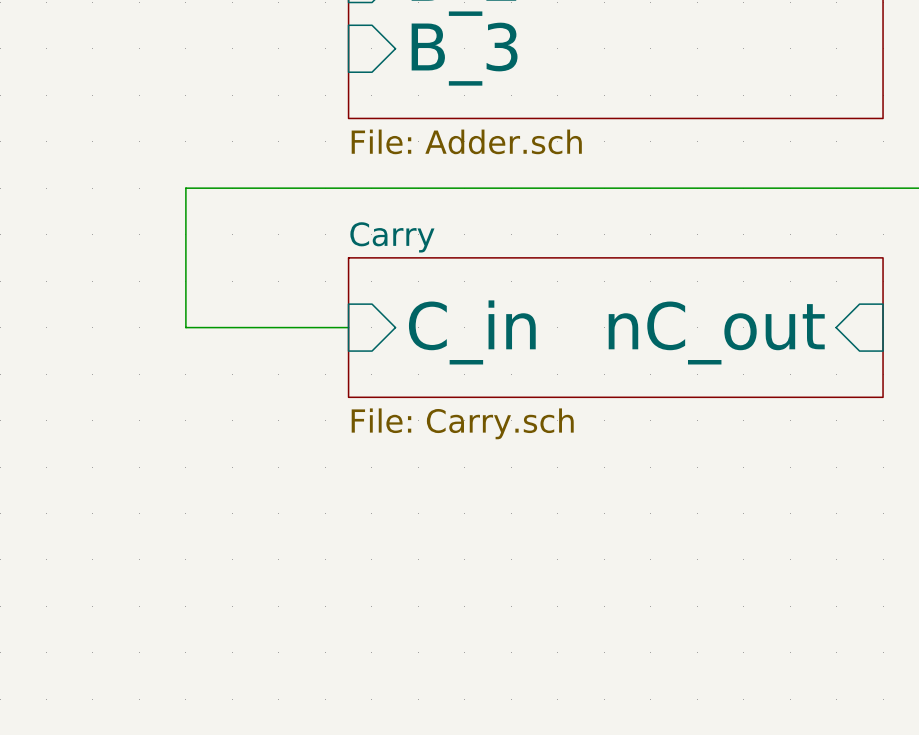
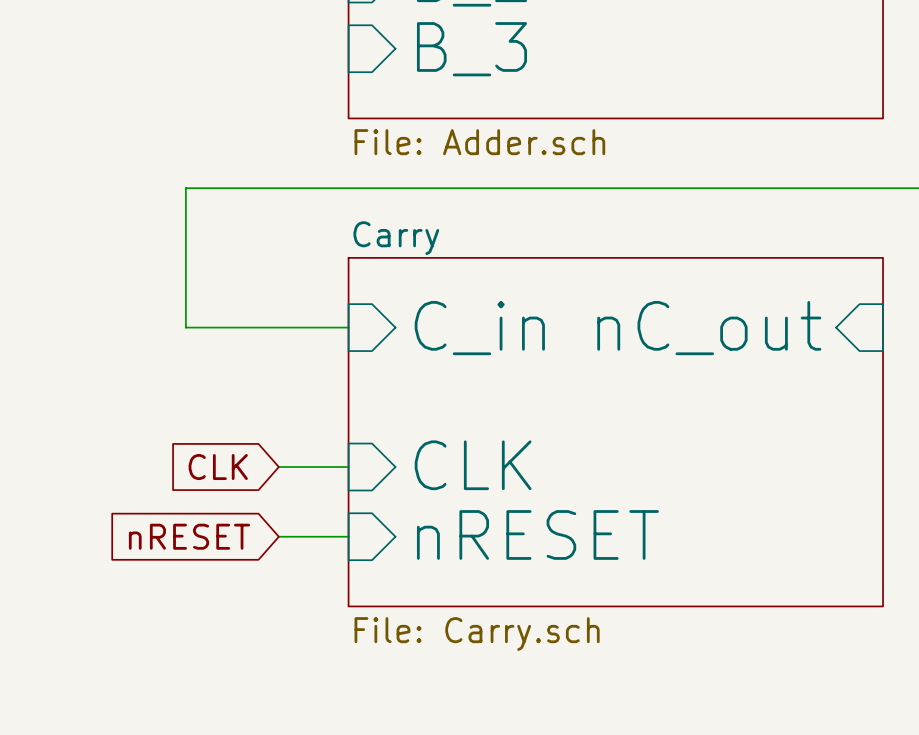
sheet Carry: File: Carry.sch (615, 327) -> none
sheet Carry: none -> File: Carry.sch (615, 432)
sheet pin: none -> CLK (473, 465)
global label: none -> CLK (218, 467)
wire: none -> (278, 467) (348, 467)
sheet pin: none -> nRESET (537, 534)
global label: none -> nRESET (189, 536)
wire: none -> (278, 536) (348, 536)

